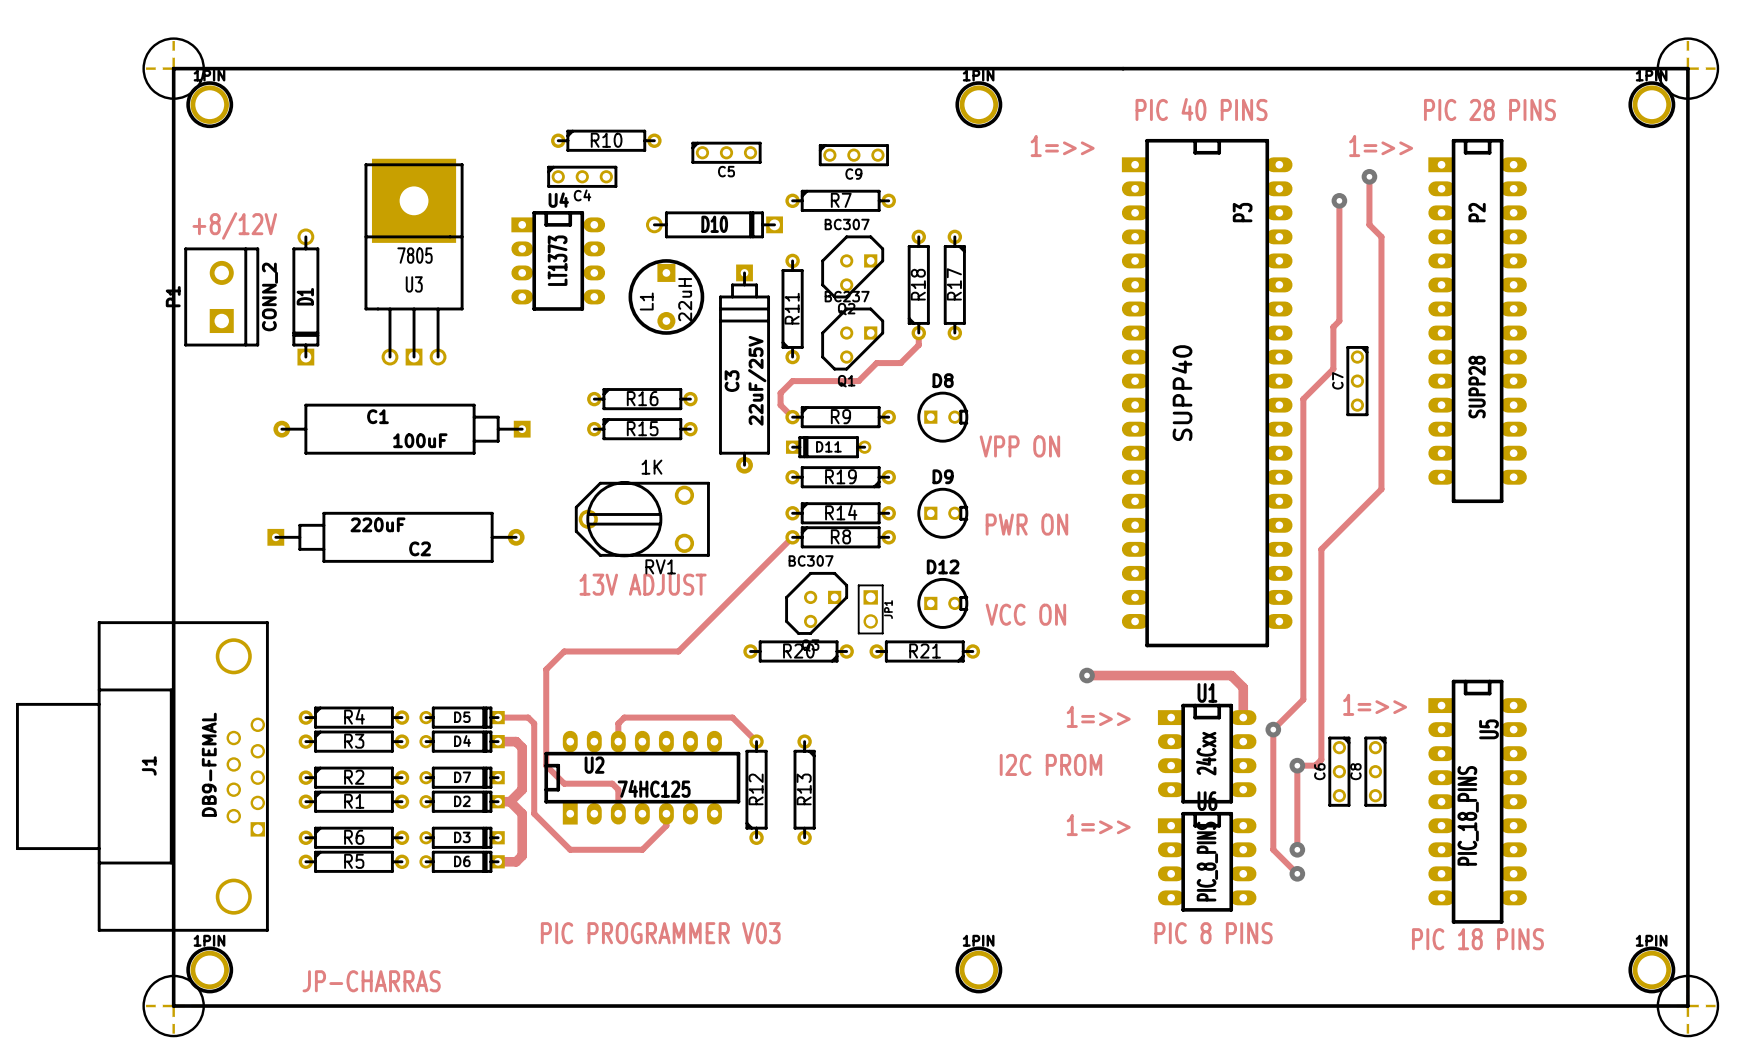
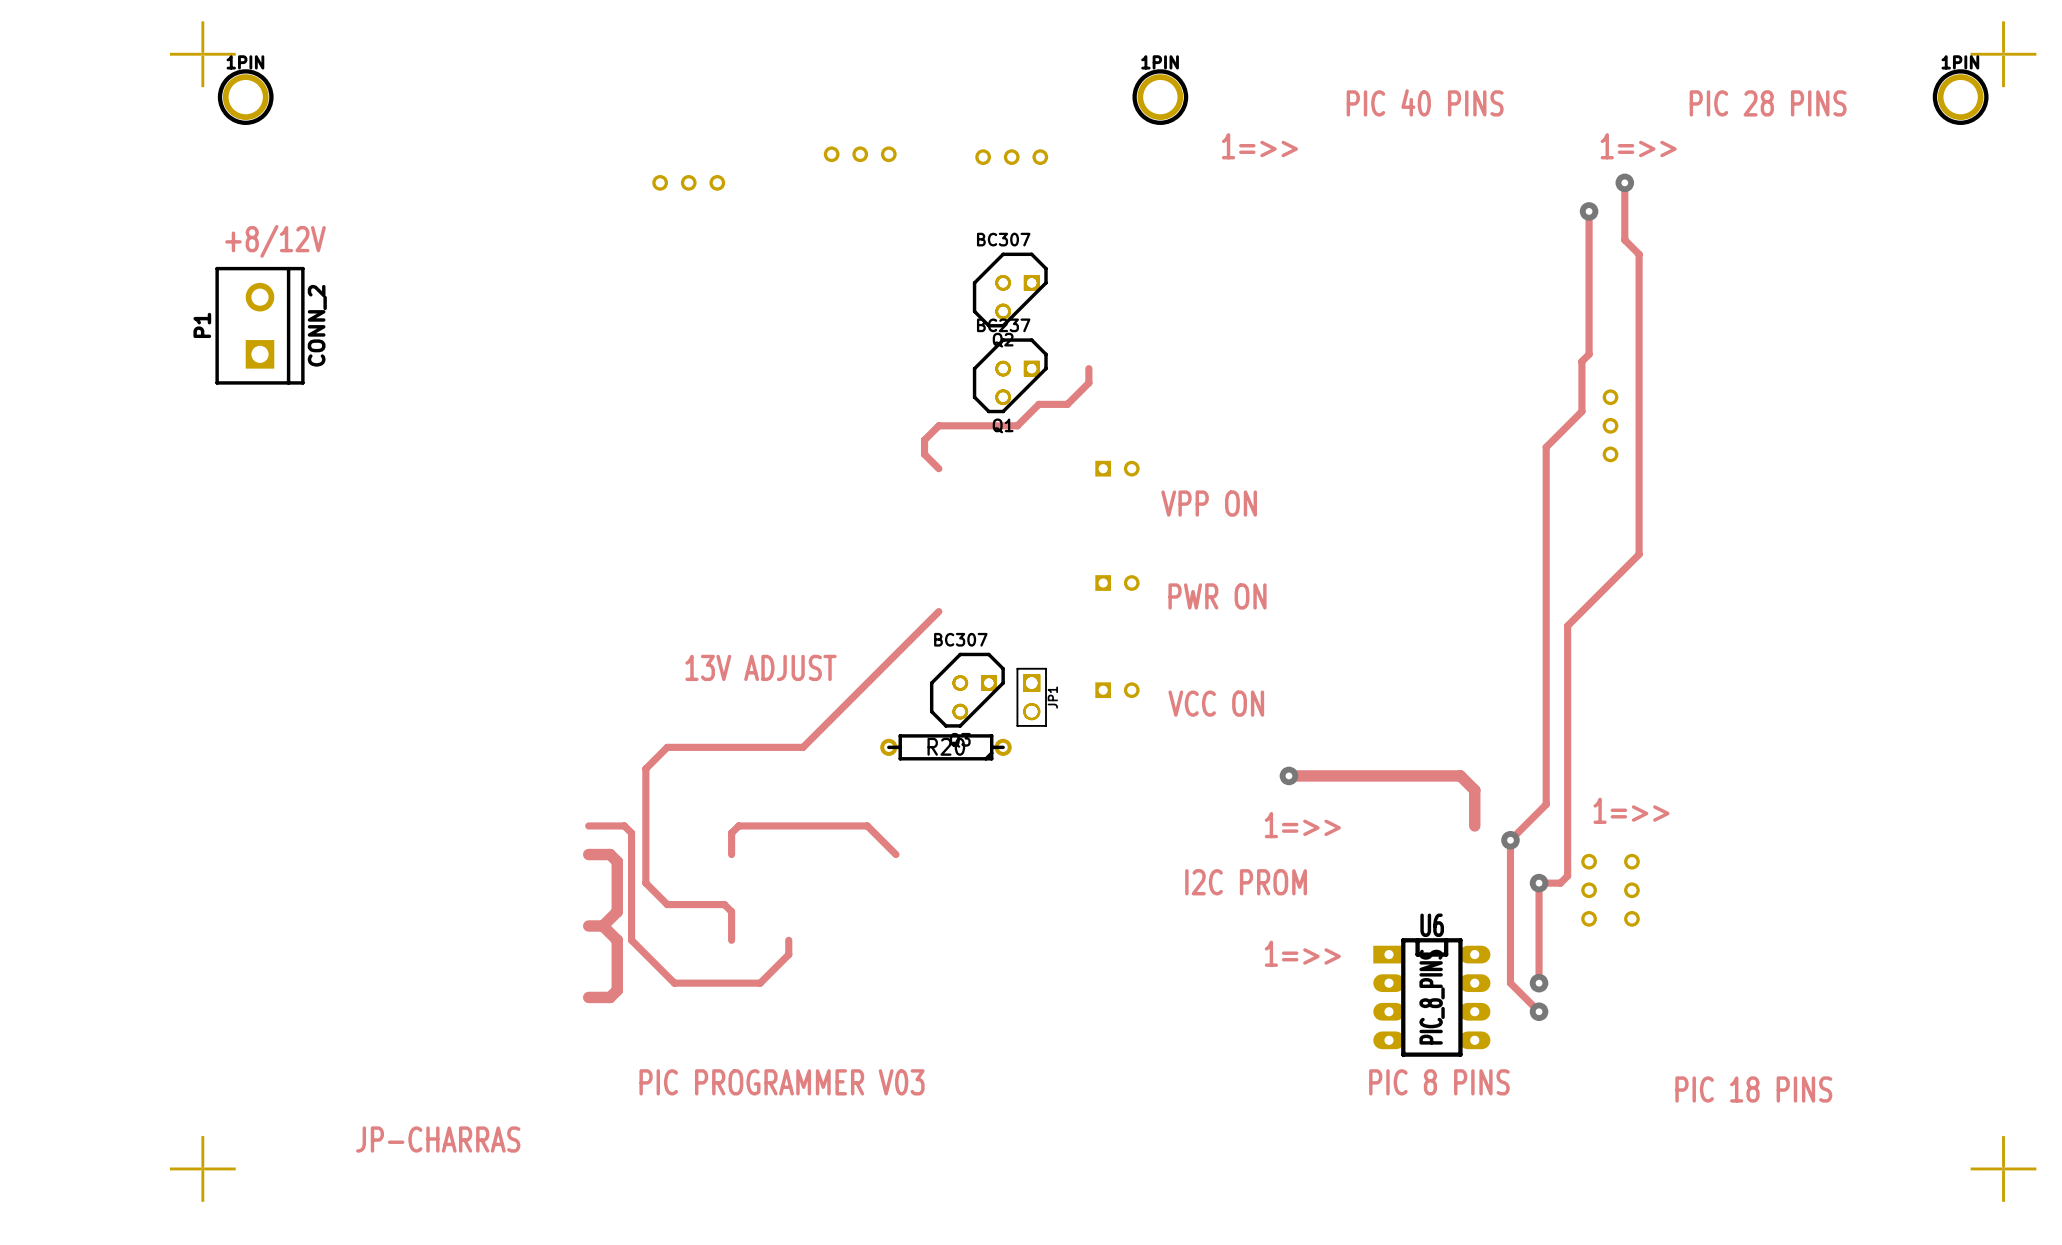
part footprint: [142, 37, 205, 100] -> [169, 21, 236, 88]
part footprint: [1656, 37, 1720, 100] -> [1970, 21, 2037, 88]
board edge: (173, 68) (173, 1006) (1687, 1006) (1687, 68) (173, 68) -> none
R10: (606, 140) -> none
C5: (726, 152) -> none
part: none -> (860, 154)
C9: (853, 155) -> none
part: none -> (1011, 157)
C4: (582, 176) -> none
part: none -> (688, 182)
R7: (840, 200) -> none
D10: (714, 224) -> none
U4: LT1373 (558, 260) -> none
U3: 7805 (414, 262) -> none
part: none -> (1017, 297)
R18: (918, 284) -> none
R17: (954, 284) -> none
D1: (305, 296) -> none
L1: 22uH (666, 296) -> none
R11: (792, 308) -> none
P2: SUPP28 (1477, 321) -> none
part: none -> (1017, 382)
C3: 22uF/25V (744, 369) -> none
C7: (1357, 381) -> none
part: none -> (1610, 425)
P3: SUPP40 (1207, 393) -> none
R16: (642, 399) -> none
R9: (840, 417) -> none
D8: (942, 417) -> none
part: none -> (1117, 468)
C1: 100uF (402, 429) -> none
R15: (642, 429) -> none
D11: (828, 447) -> none
R19: (840, 477) -> none
R14: (840, 513) -> none
D9: (942, 513) -> none
part: none -> (1117, 583)
RV1: 1K (642, 519) -> none
C2: 220uF (396, 537) -> none
R8: (840, 537) -> none
D12: (942, 603) -> none
part: none -> (1117, 690)
part: none -> (974, 697)
part: none -> (1031, 697)
R21: (924, 651) -> none
R4: (353, 717) -> none
D5: (462, 717) -> none
R3: (353, 741) -> none
D4: (462, 741) -> none
U1: 24Cxx (1207, 753) -> none
C6: (1339, 771) -> none
part: none -> (1589, 890)
C8: (1375, 771) -> none
part: none -> (1631, 890)
J1: DB9-FEMAL (142, 776) -> none
R2: (353, 777) -> none
D7: (462, 777) -> none
U2: 74HC125 (642, 777) -> none
R12: (756, 789) -> none
R13: (804, 789) -> none
R1: (353, 801) -> none
D2: (462, 801) -> none
U5: PIC_18_PINS (1477, 801) -> none
R6: (353, 837) -> none
D3: (462, 837) -> none
R5: (353, 861) -> none
D6: (462, 861) -> none
1PIN: (209, 969) -> none
1PIN: (978, 969) -> none
1PIN: (1651, 969) -> none
part footprint: [142, 974, 205, 1038] -> [169, 1136, 236, 1202]
part footprint: [1656, 974, 1720, 1038] -> [1970, 1136, 2037, 1202]

